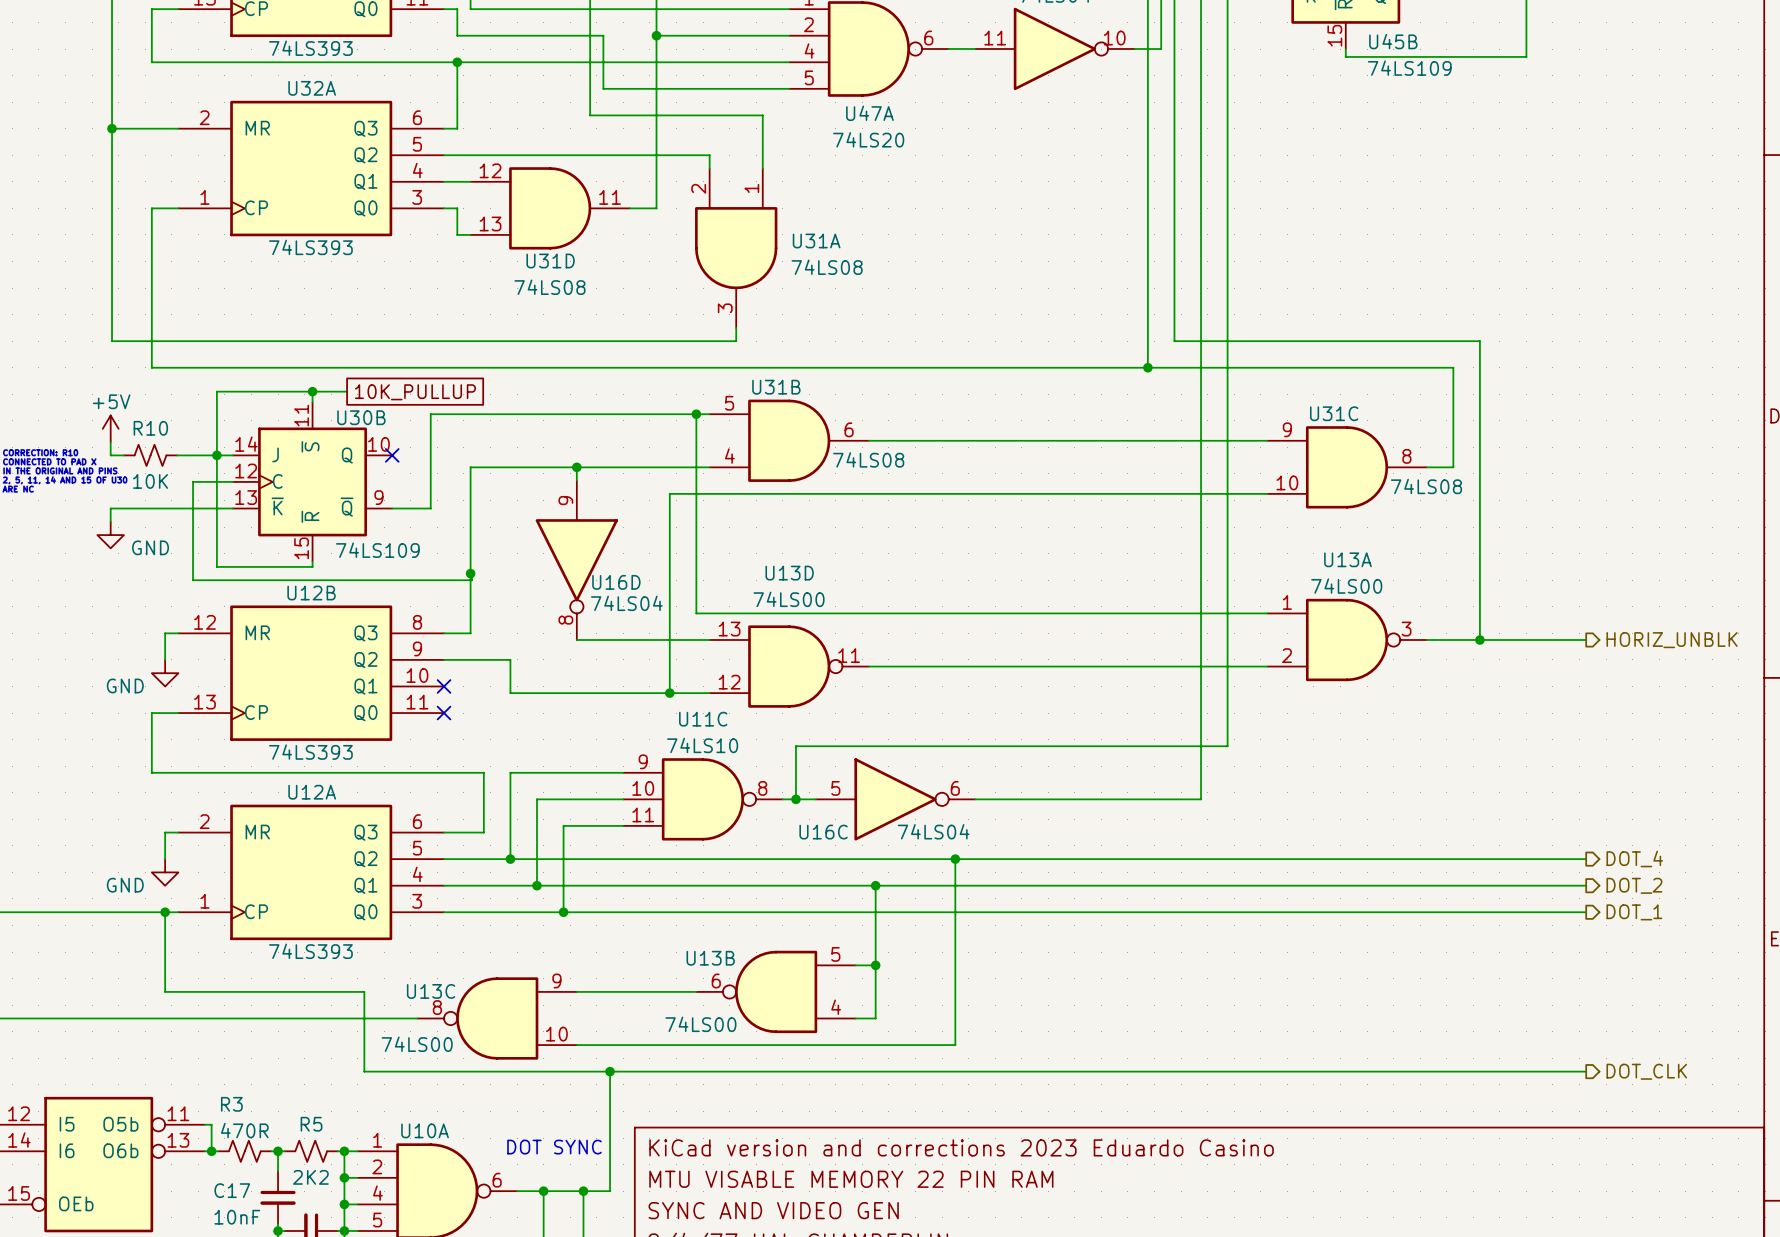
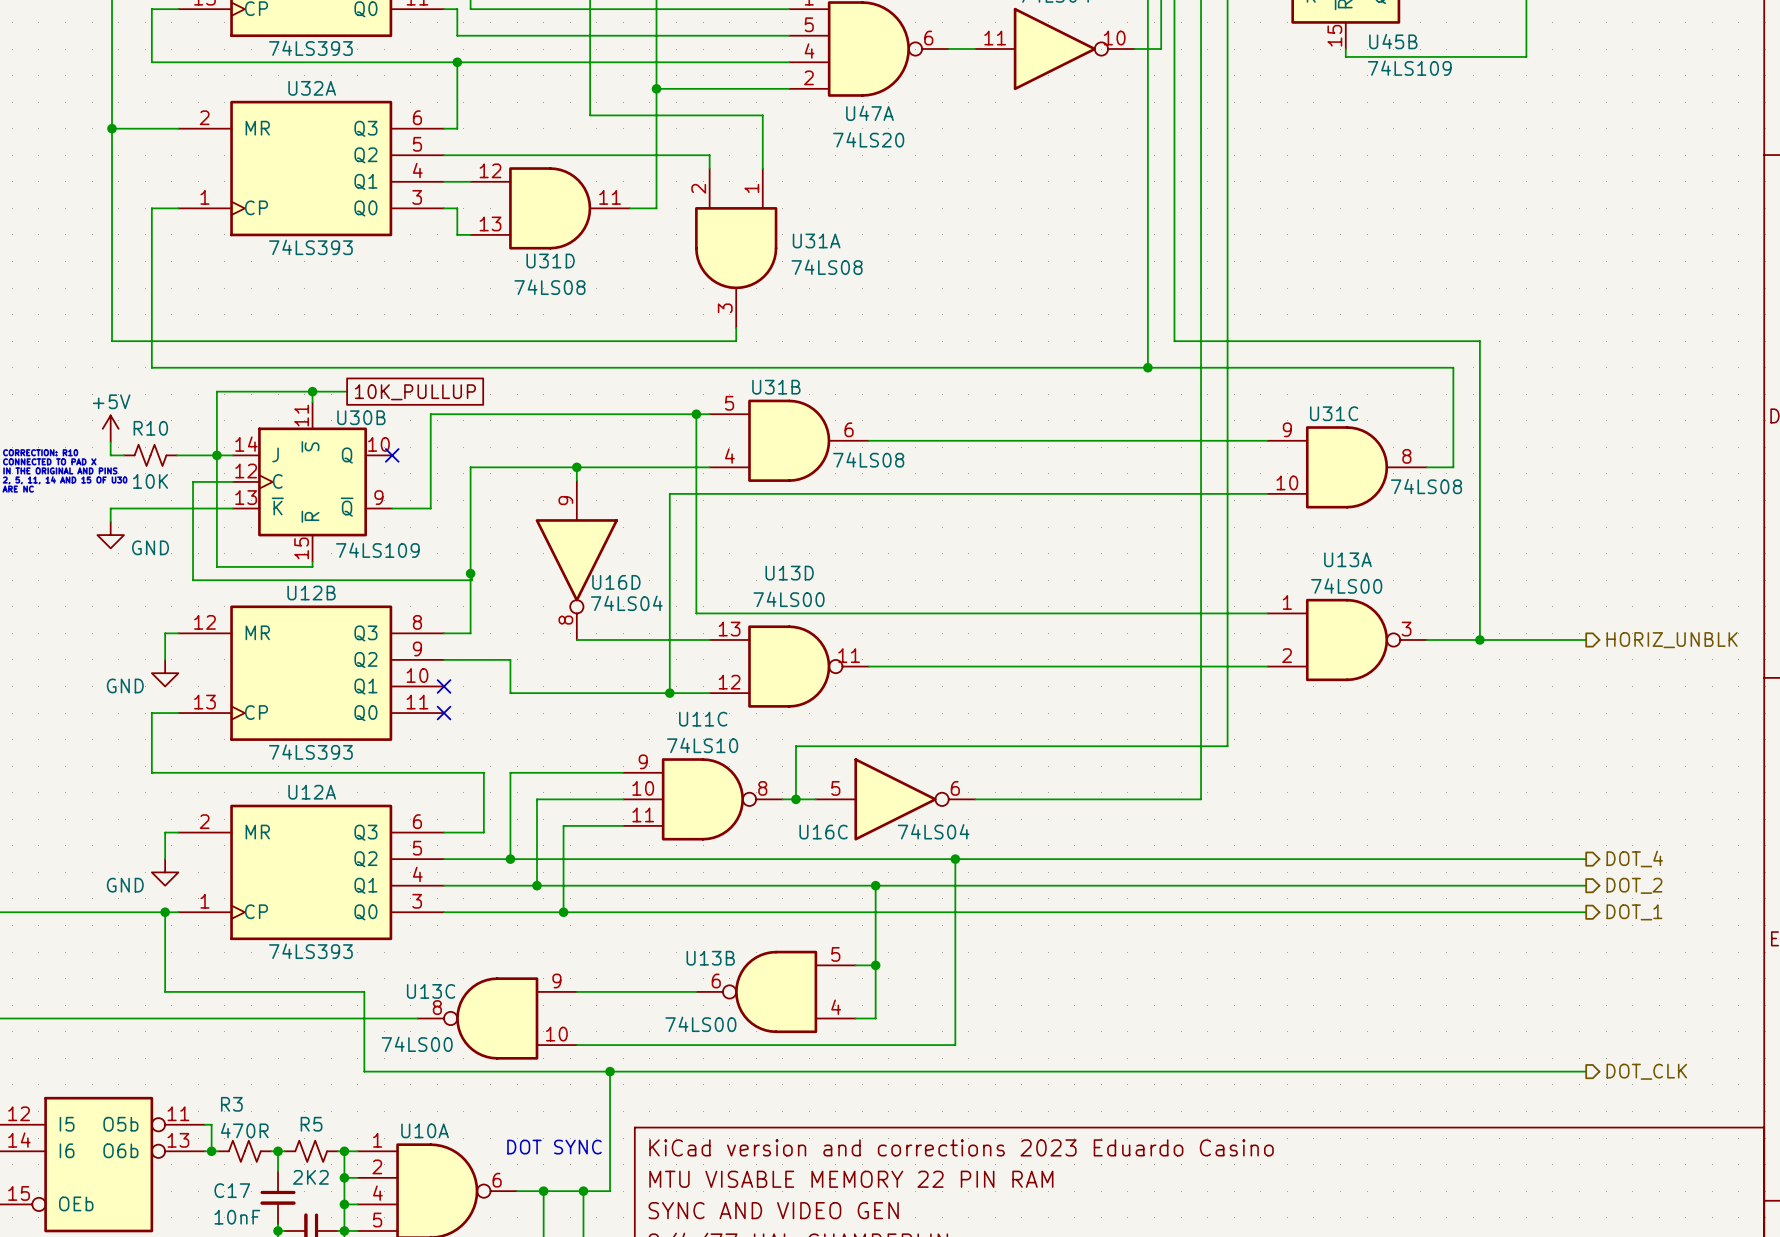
U47A pin number: 2 (808, 24) -> 5 (809, 24)
wire: (603, 35) (603, 88) (656, 88) -> (603, 35) (656, 35)
junction position: (656, 35) -> (656, 88)
U47A pin number: 5 (809, 77) -> 2 (808, 77)

